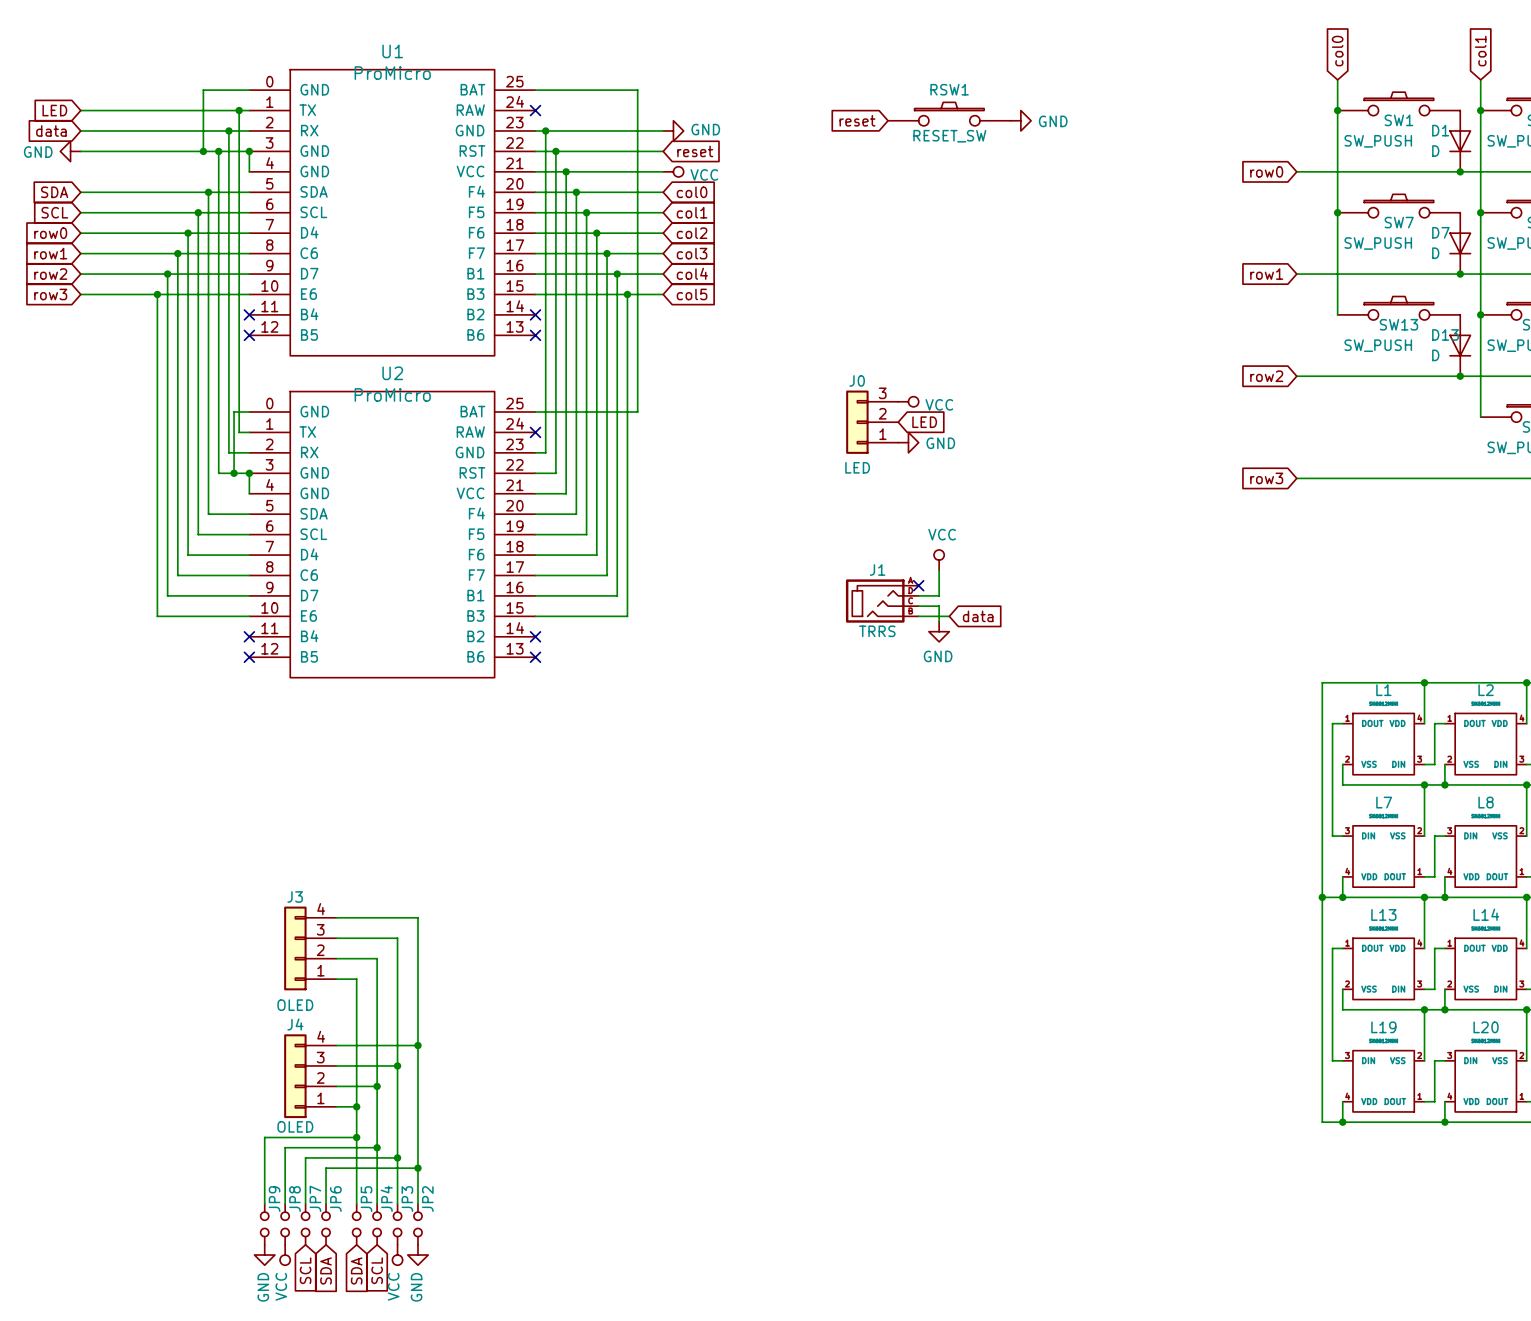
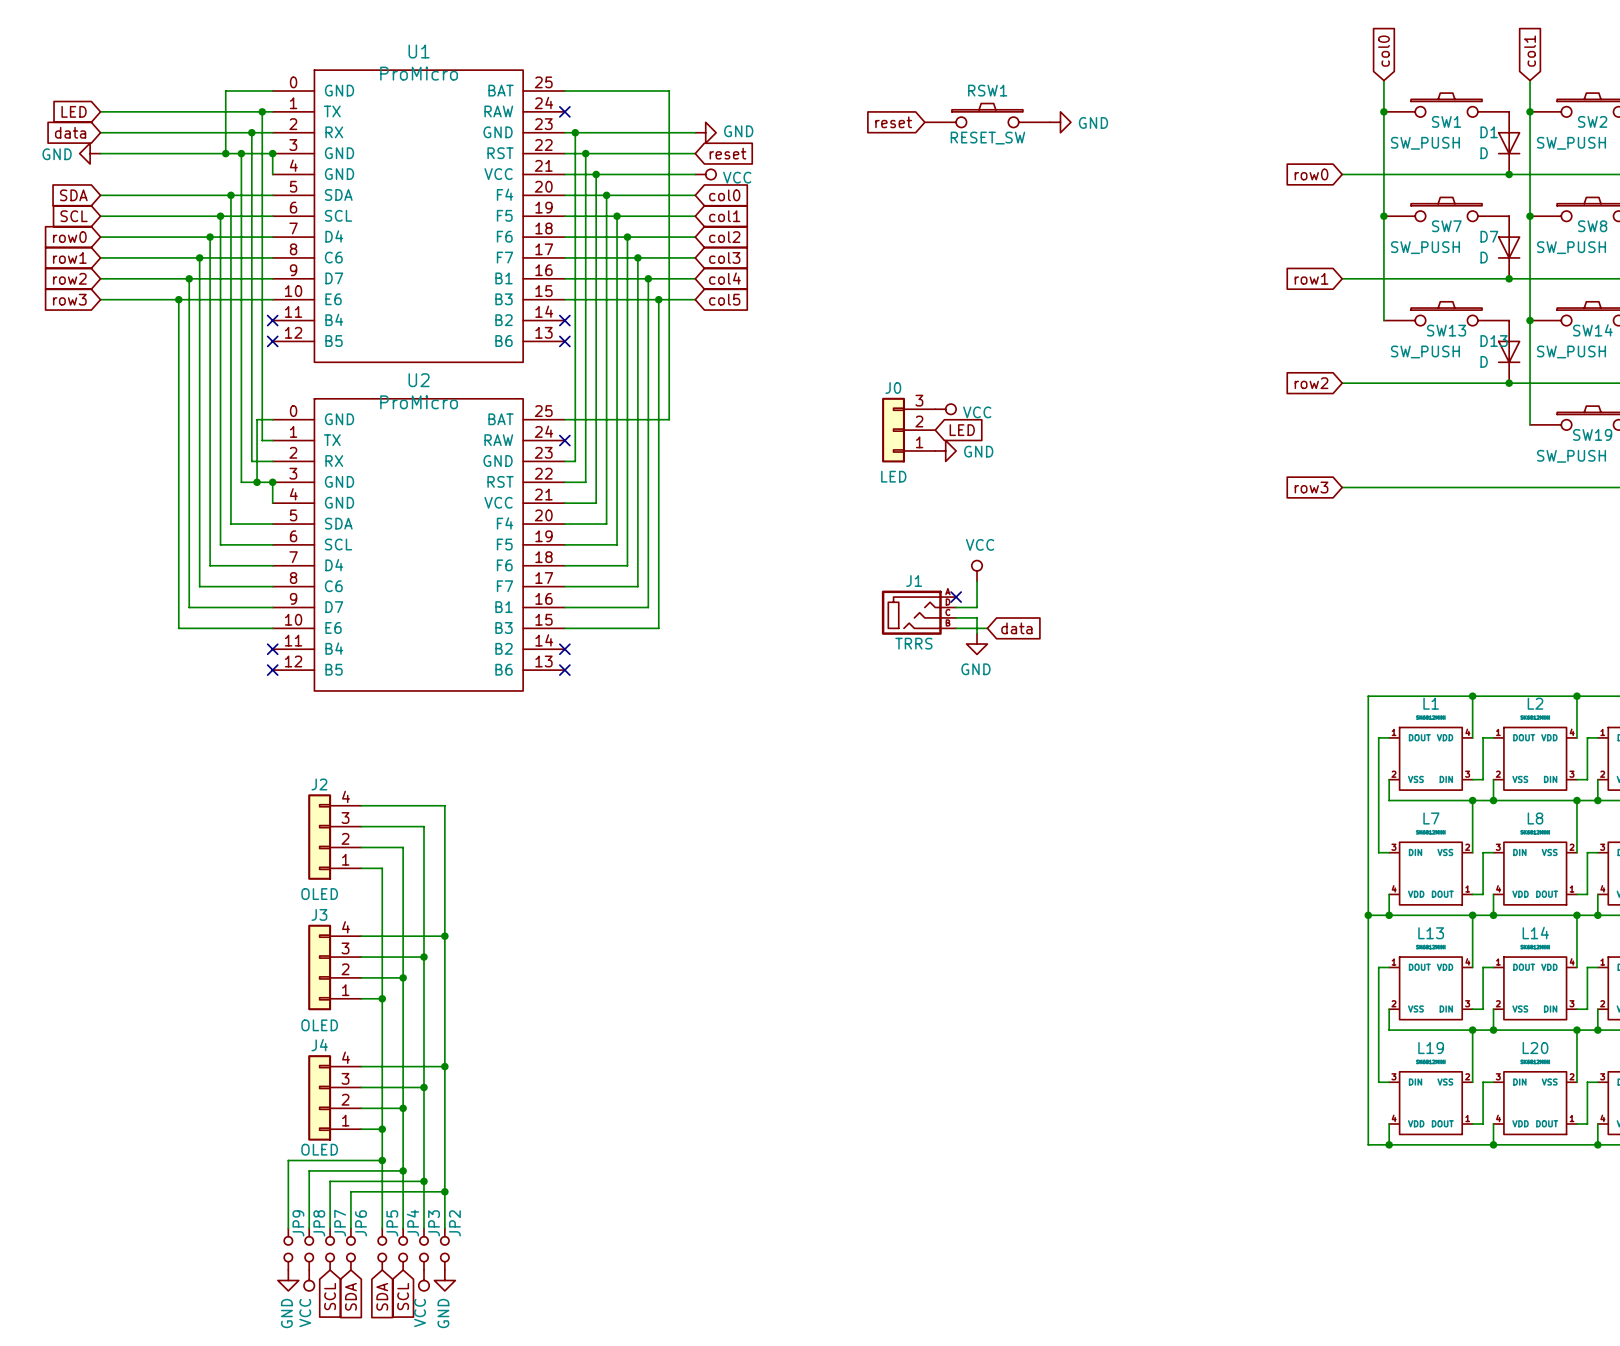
wire: none -> (361, 805) (444, 805) (444, 936)
wire: none -> (361, 826) (423, 826) (423, 957)
J2: none -> OLED (334, 837)
wire: none -> (361, 847) (403, 847) (403, 977)
wire: none -> (361, 868) (382, 868) (382, 998)
junction: none -> (444, 936)
junction: none -> (423, 957)
junction: none -> (403, 977)
junction: none -> (382, 998)

